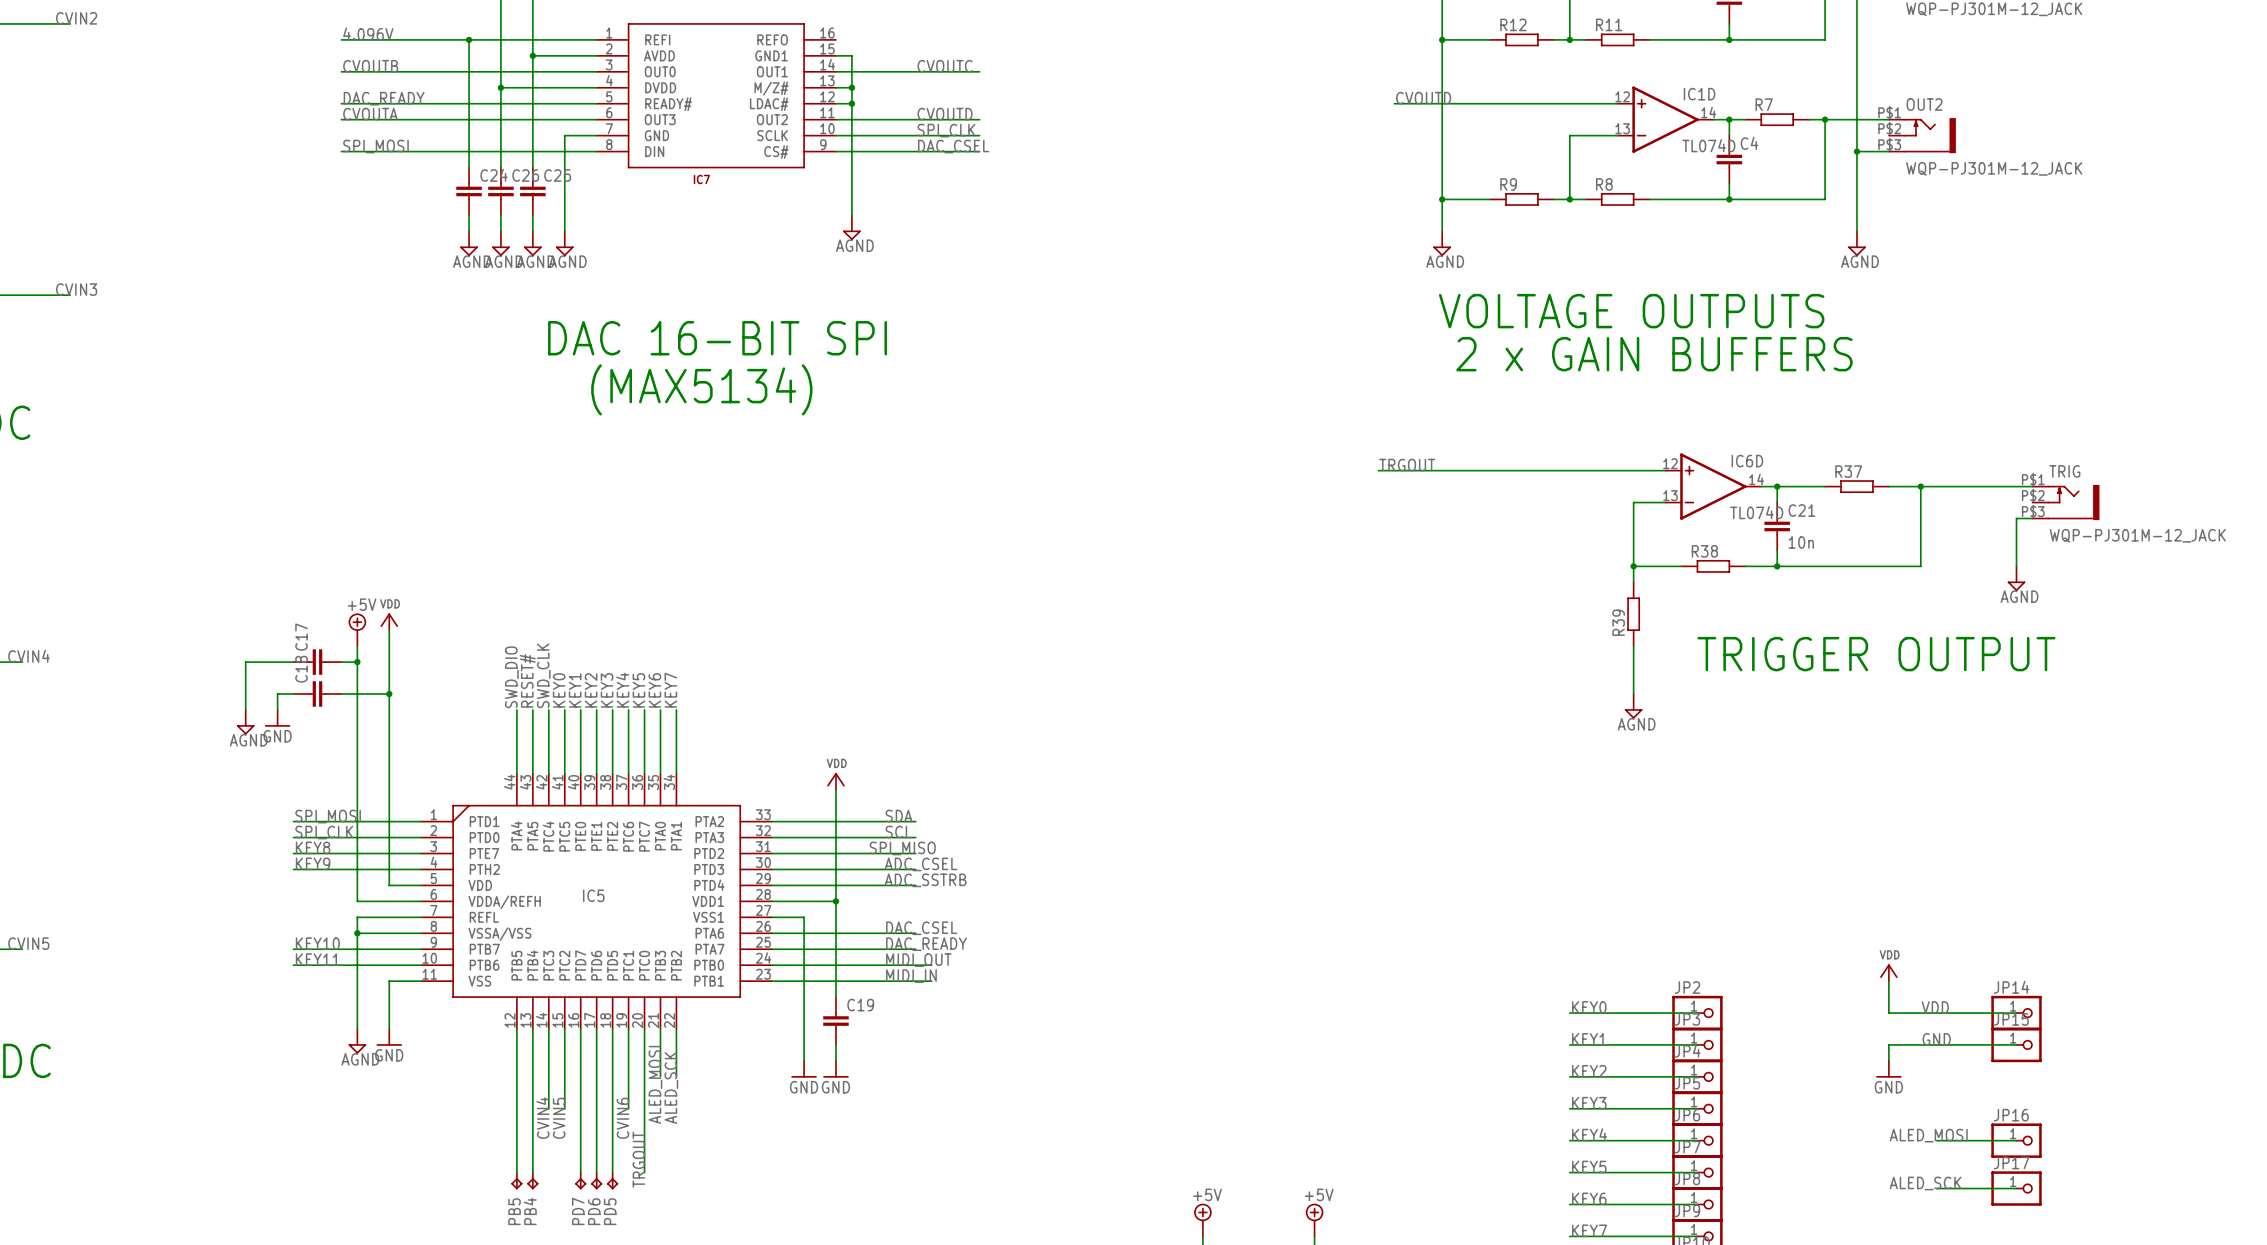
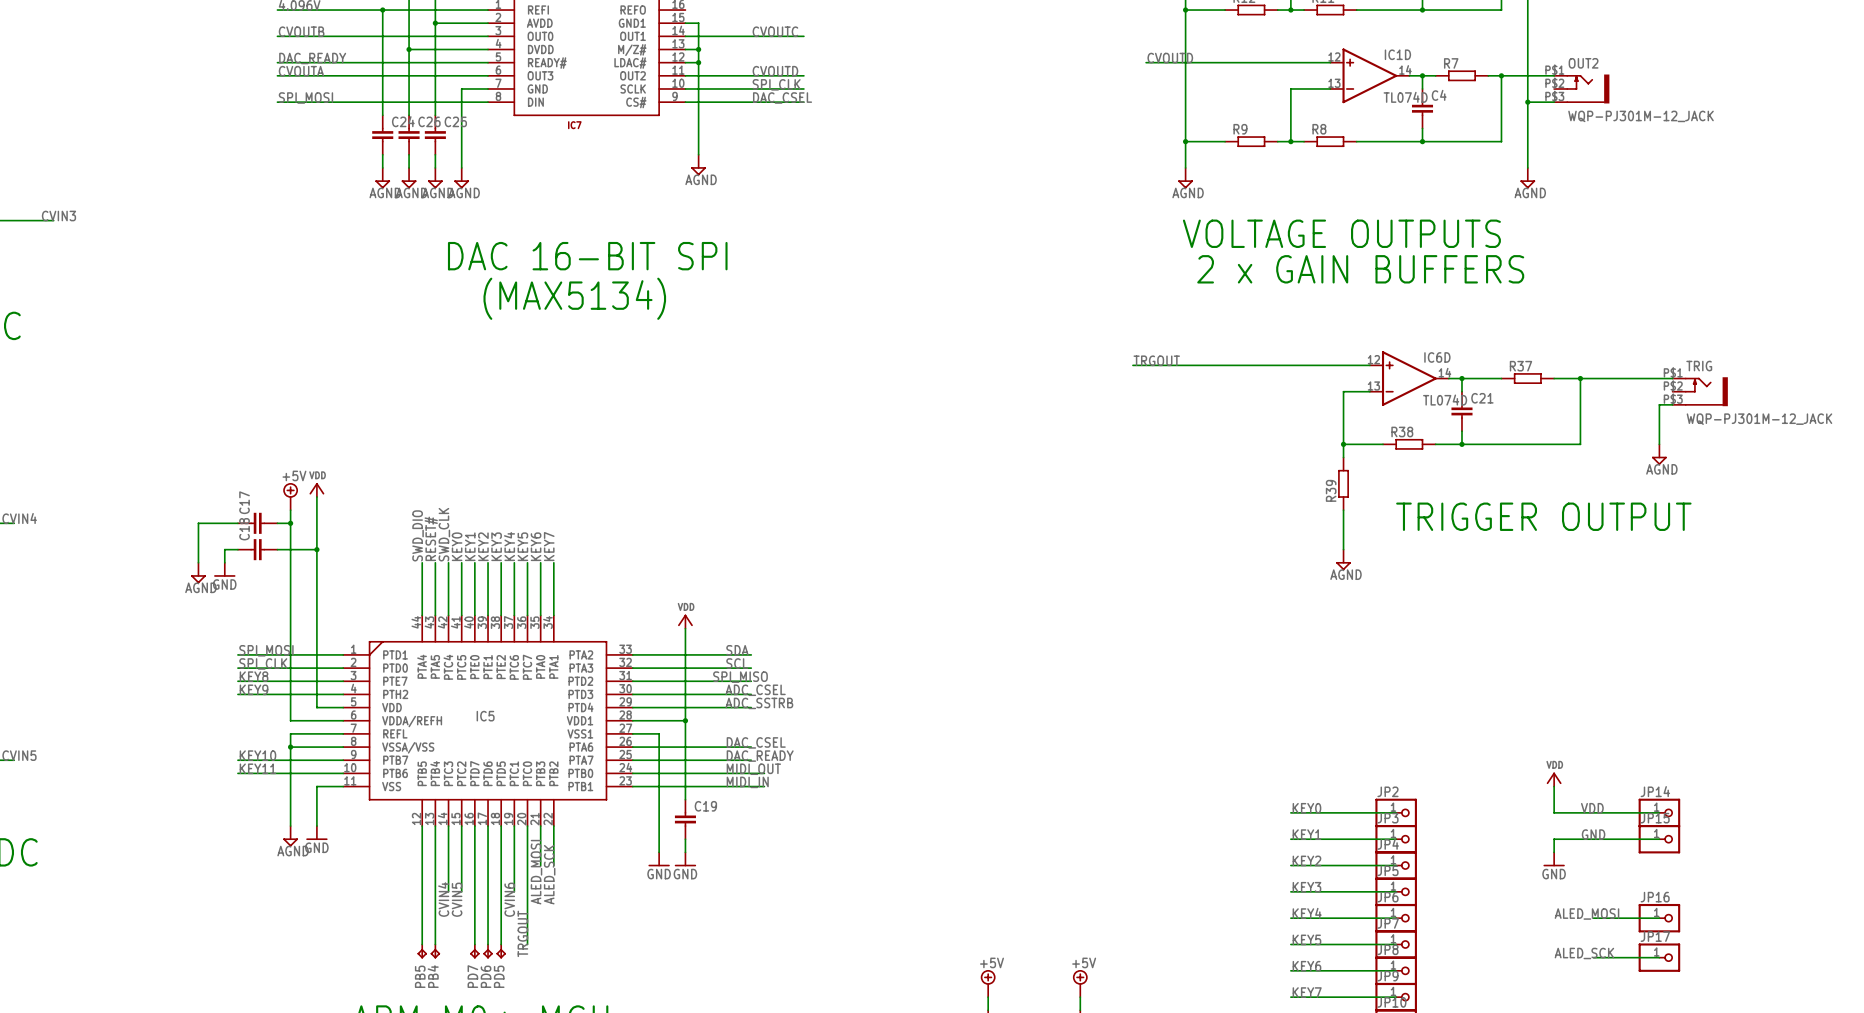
C21 value: 10n (1801, 542) -> none

